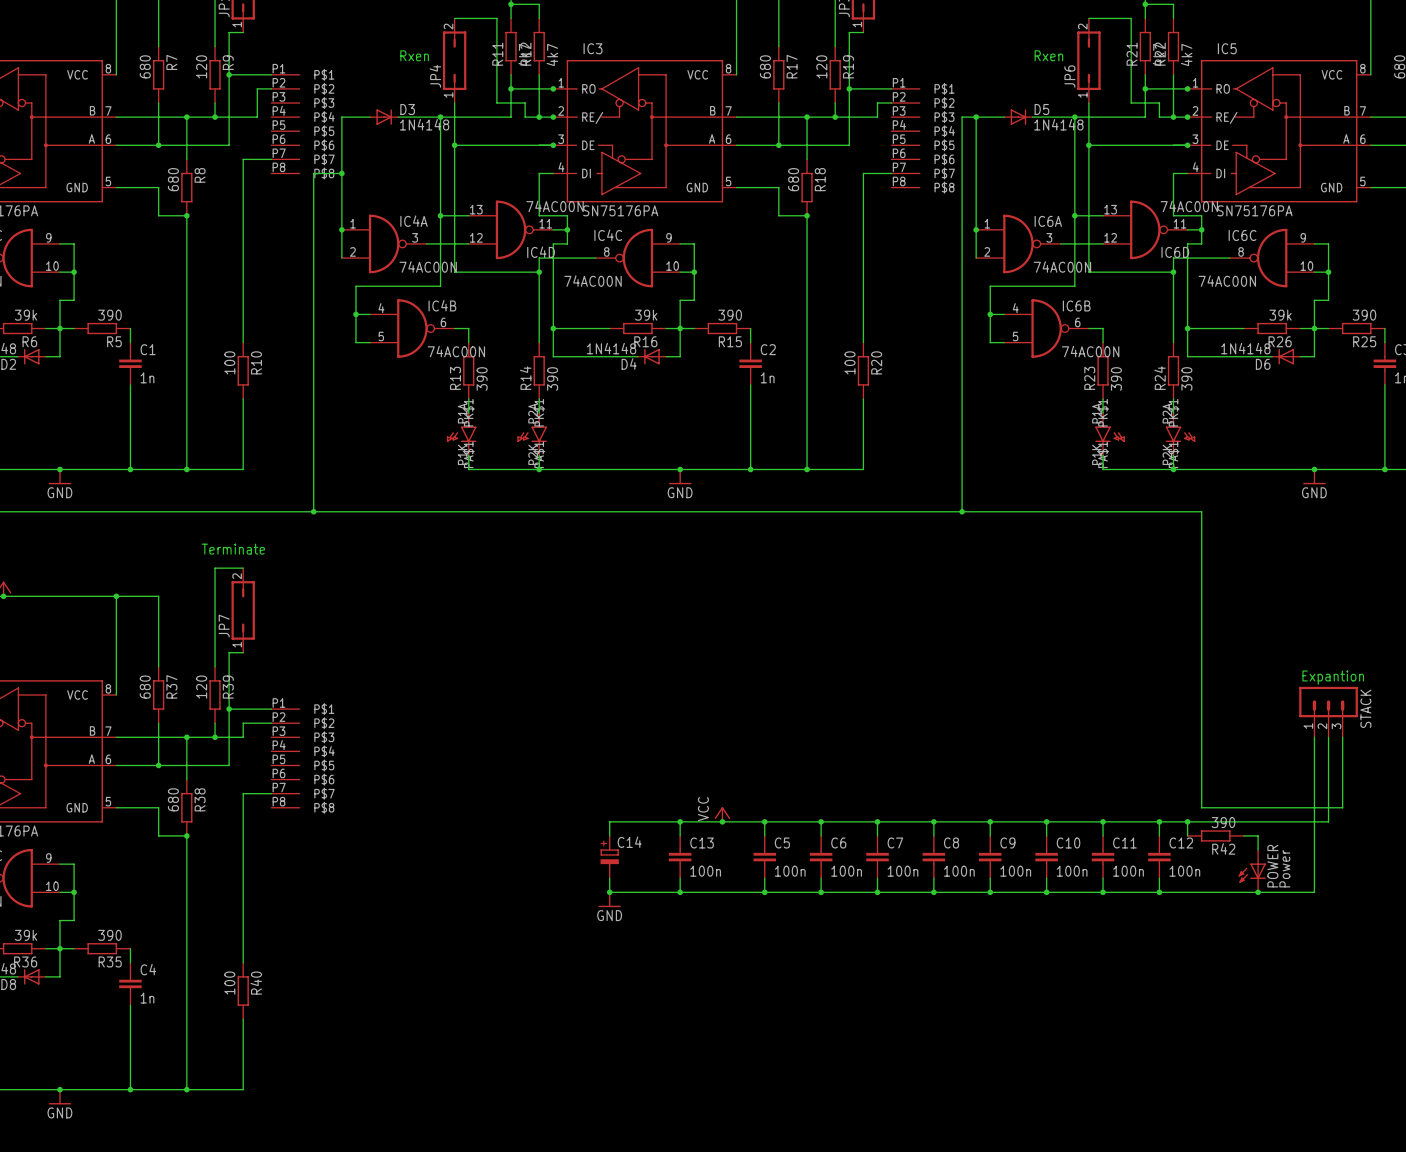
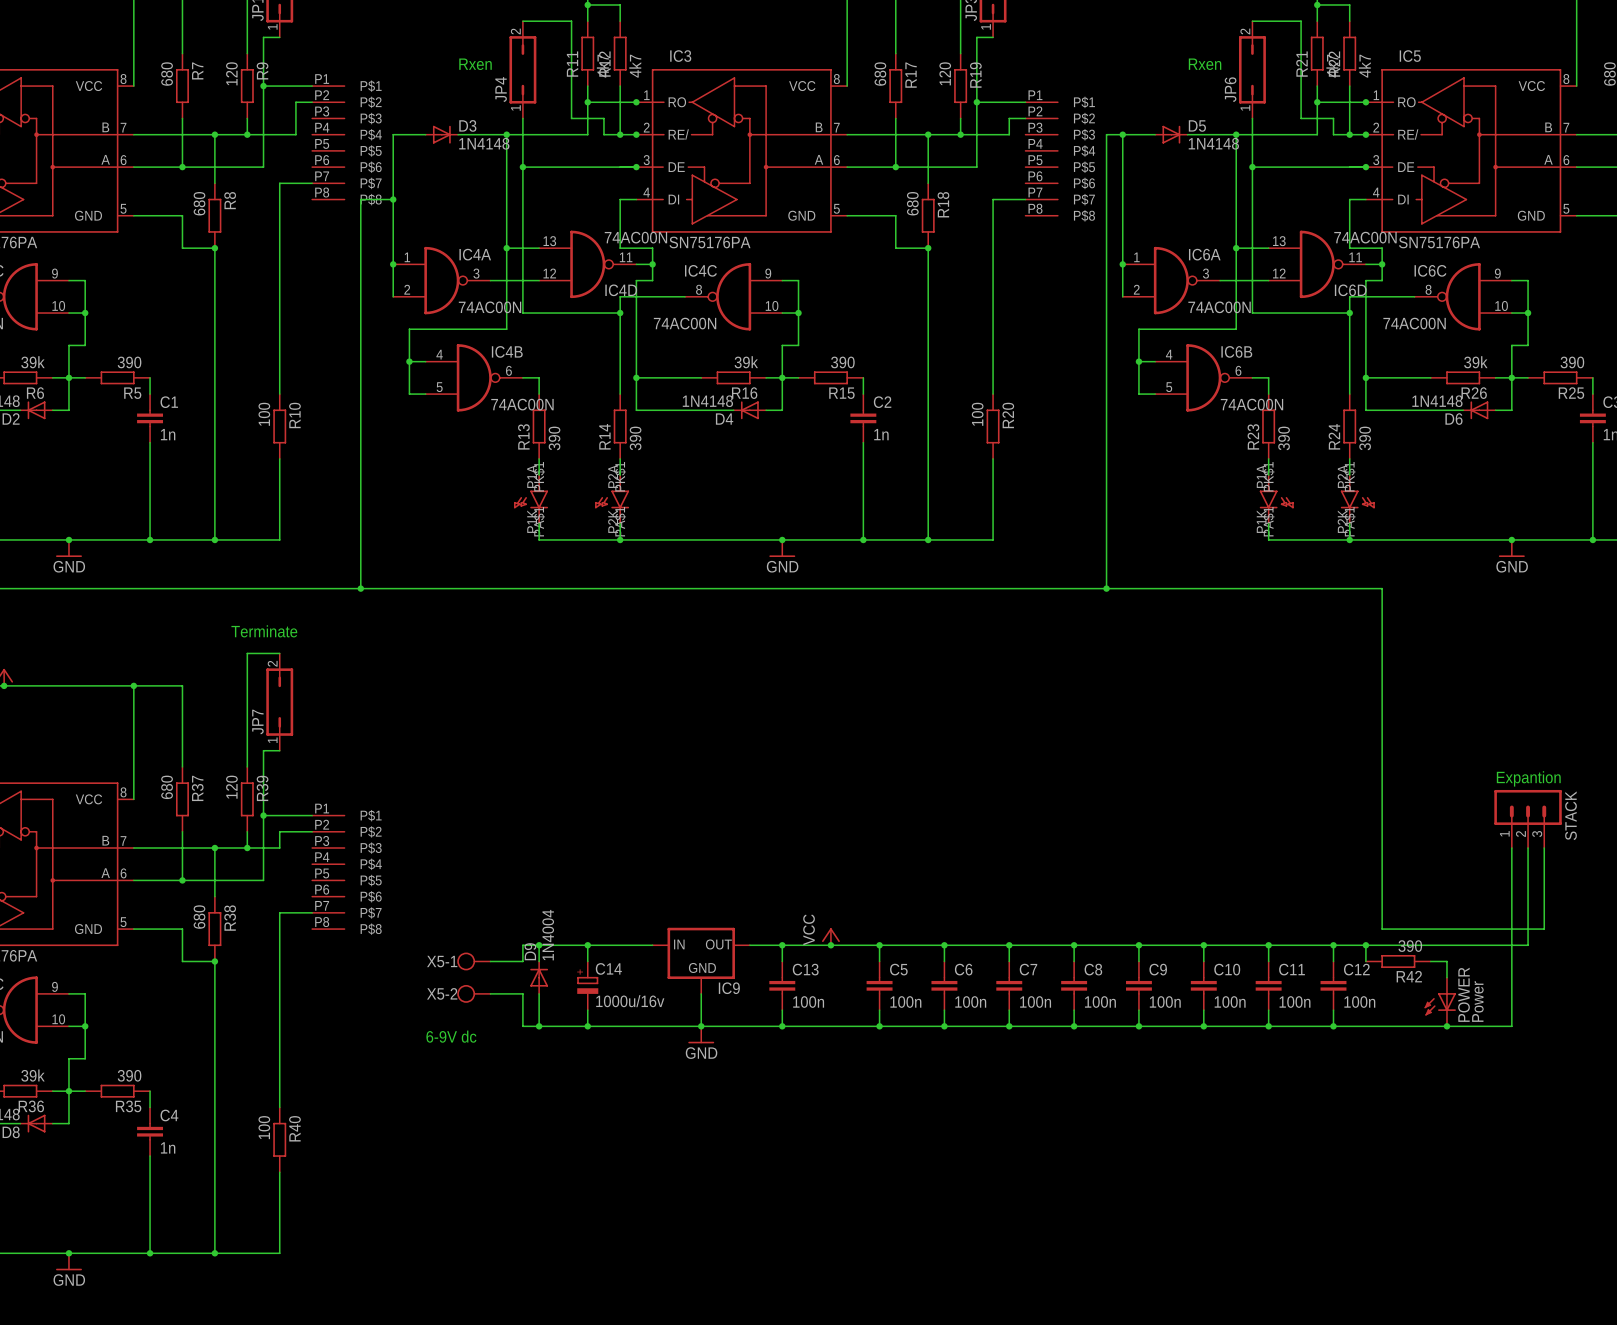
wire: none -> (539, 945) (539, 961)
junction: none -> (539, 945)
wire: none -> (587, 945) (587, 961)
junction: none -> (587, 945)
wire: none -> (652, 945) (522, 945) (522, 961) (490, 961)
wire: (651, 821) (609, 821) (609, 835) -> none
X5-1: none -> (473, 961)
IC9: none -> (701, 960)
D9: none -> 1N4004 (539, 977)
C14 position: (609, 857) -> (587, 985)
X5-2: none -> (473, 993)
wire: none -> (490, 993) (522, 993) (522, 1026) (701, 1026)
wire: none -> (539, 993) (539, 1026)
C14 value: none -> 1000u/16v (630, 1001)
wire: none -> (587, 1010) (587, 1026)
junction: none -> (539, 1026)
junction: none -> (587, 1026)
text: none -> 6-9V dc (451, 1036)

